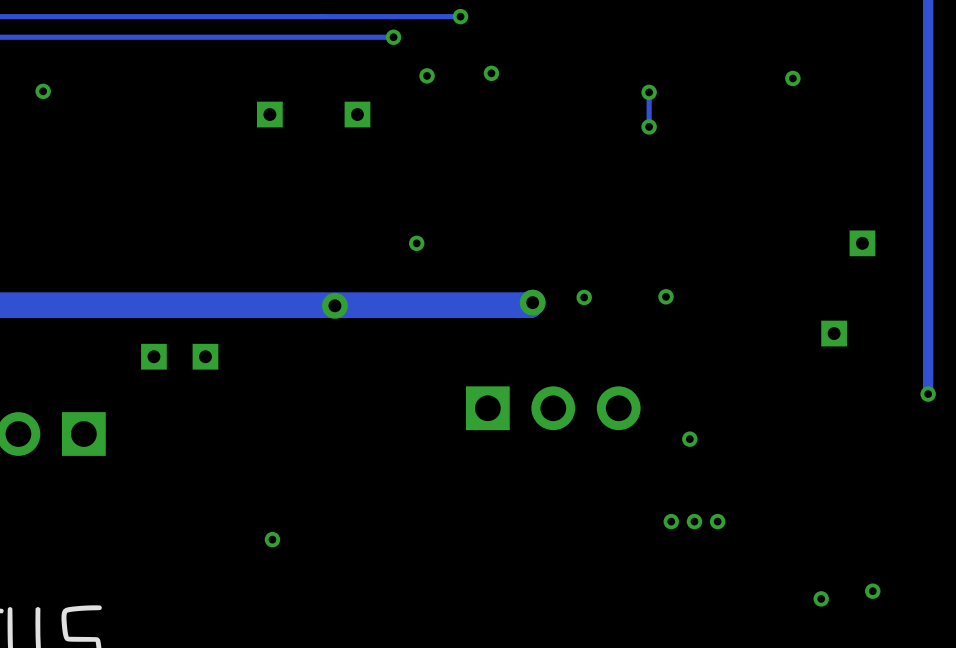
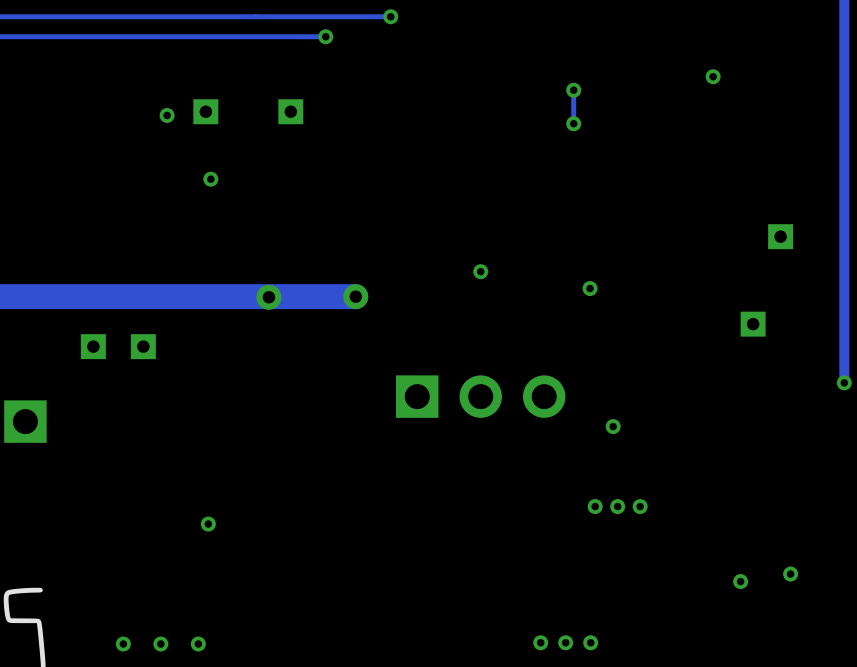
via: (491, 73) -> none
via: (427, 75) -> none
via: none -> (167, 115)
via: none -> (210, 179)
via: (416, 243) -> none
via position: (584, 297) -> (480, 271)
track: (532, 302) (530, 305) (424, 305) -> none
via position: (532, 302) -> (355, 296)

